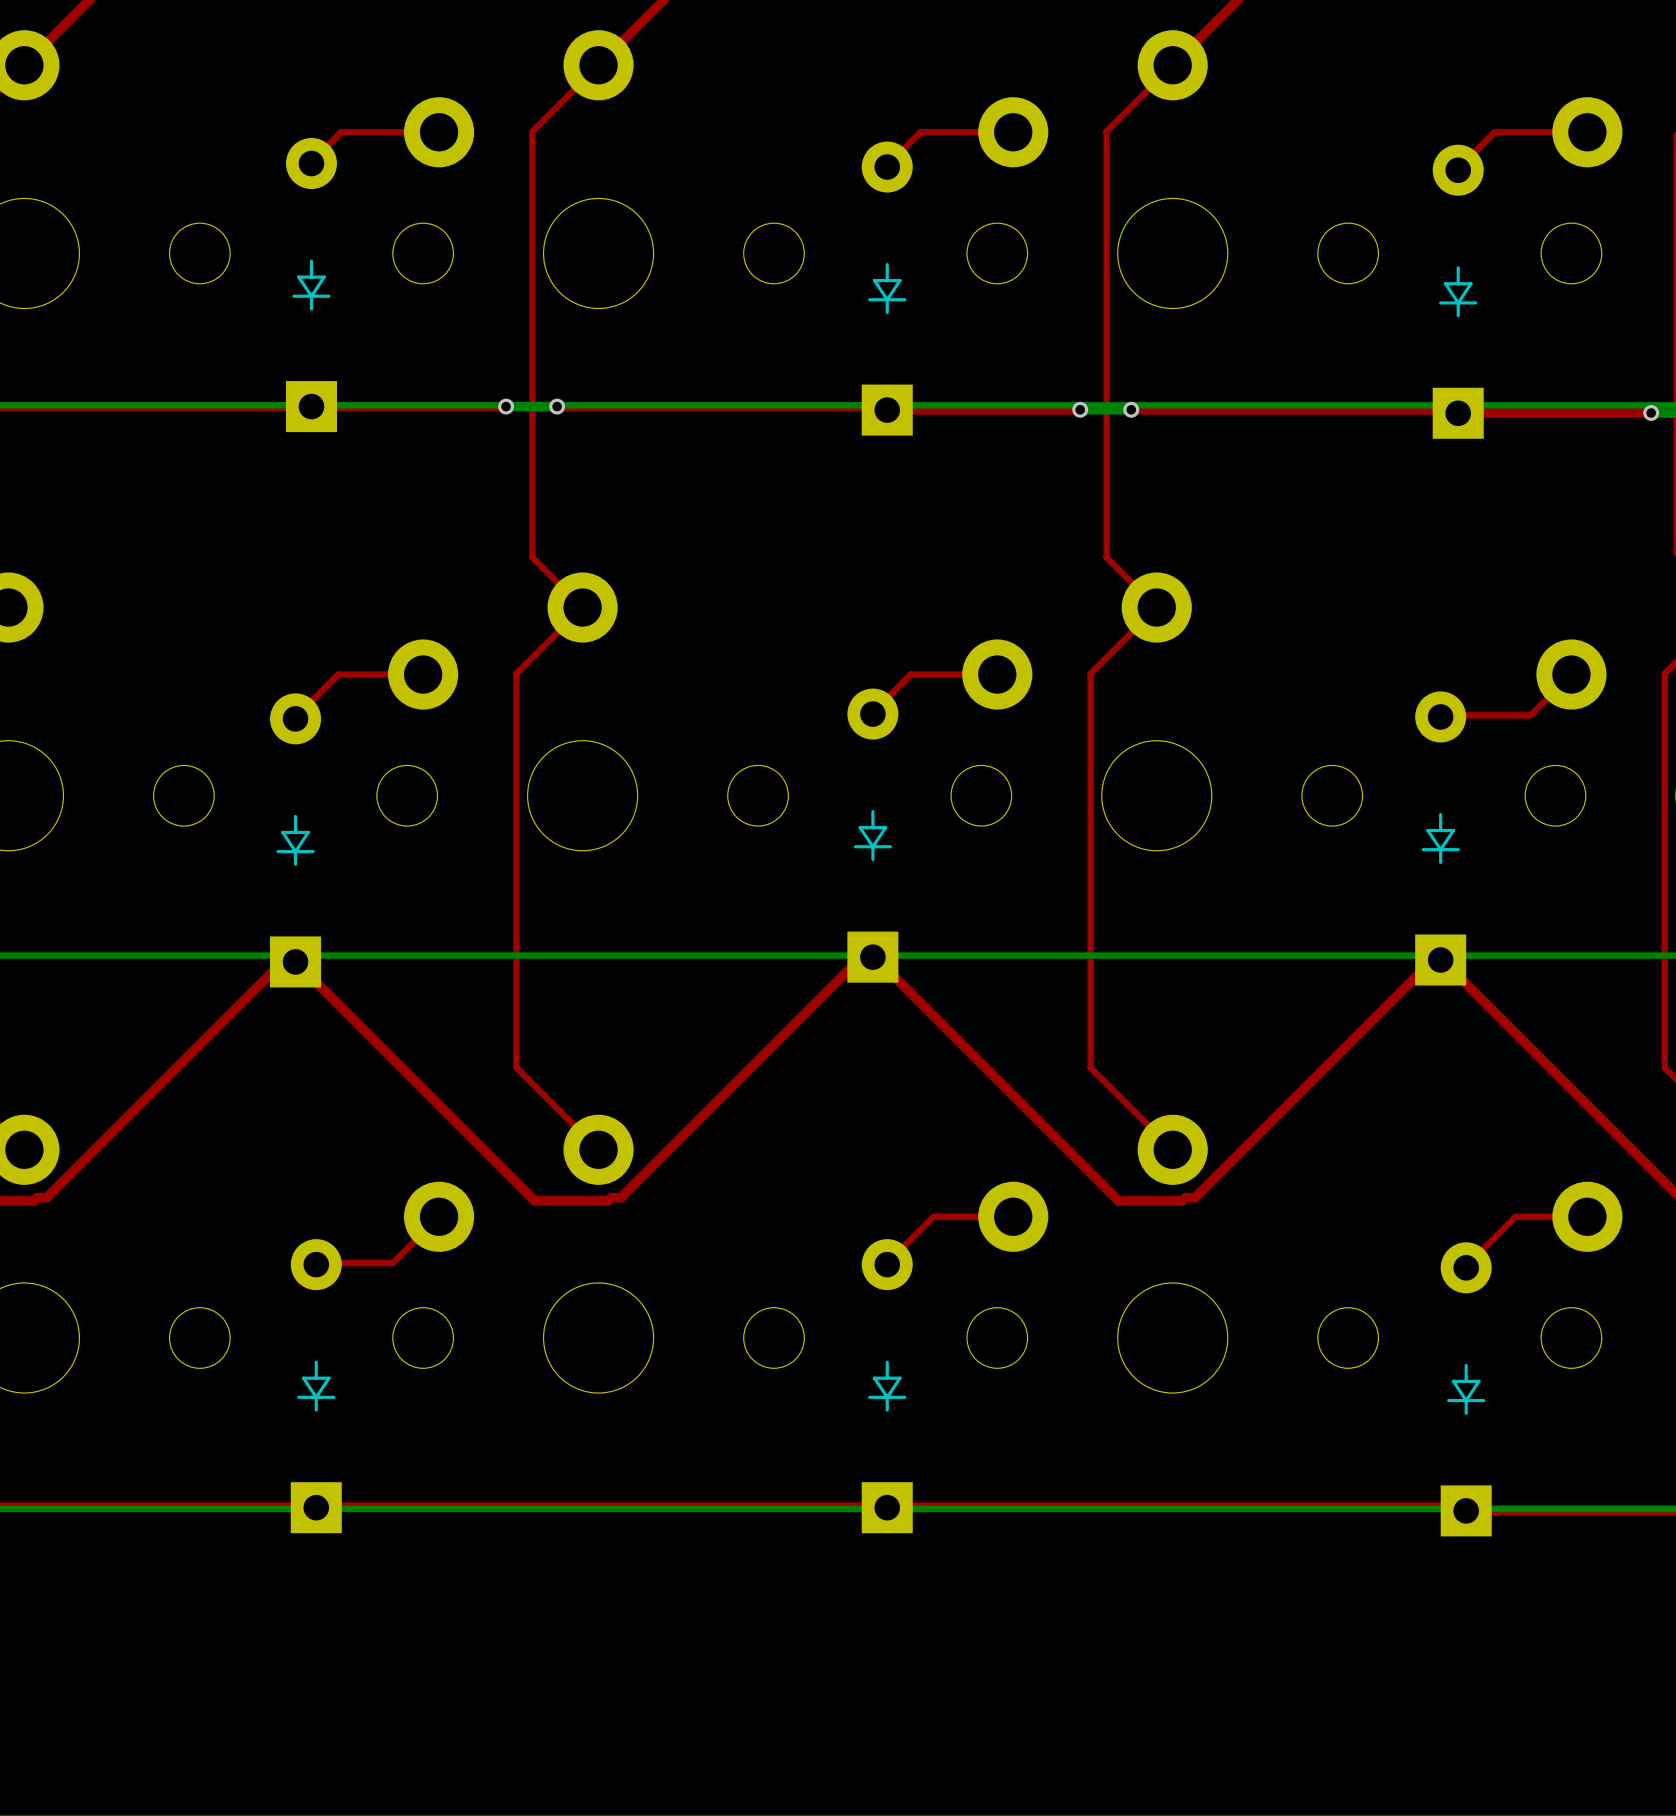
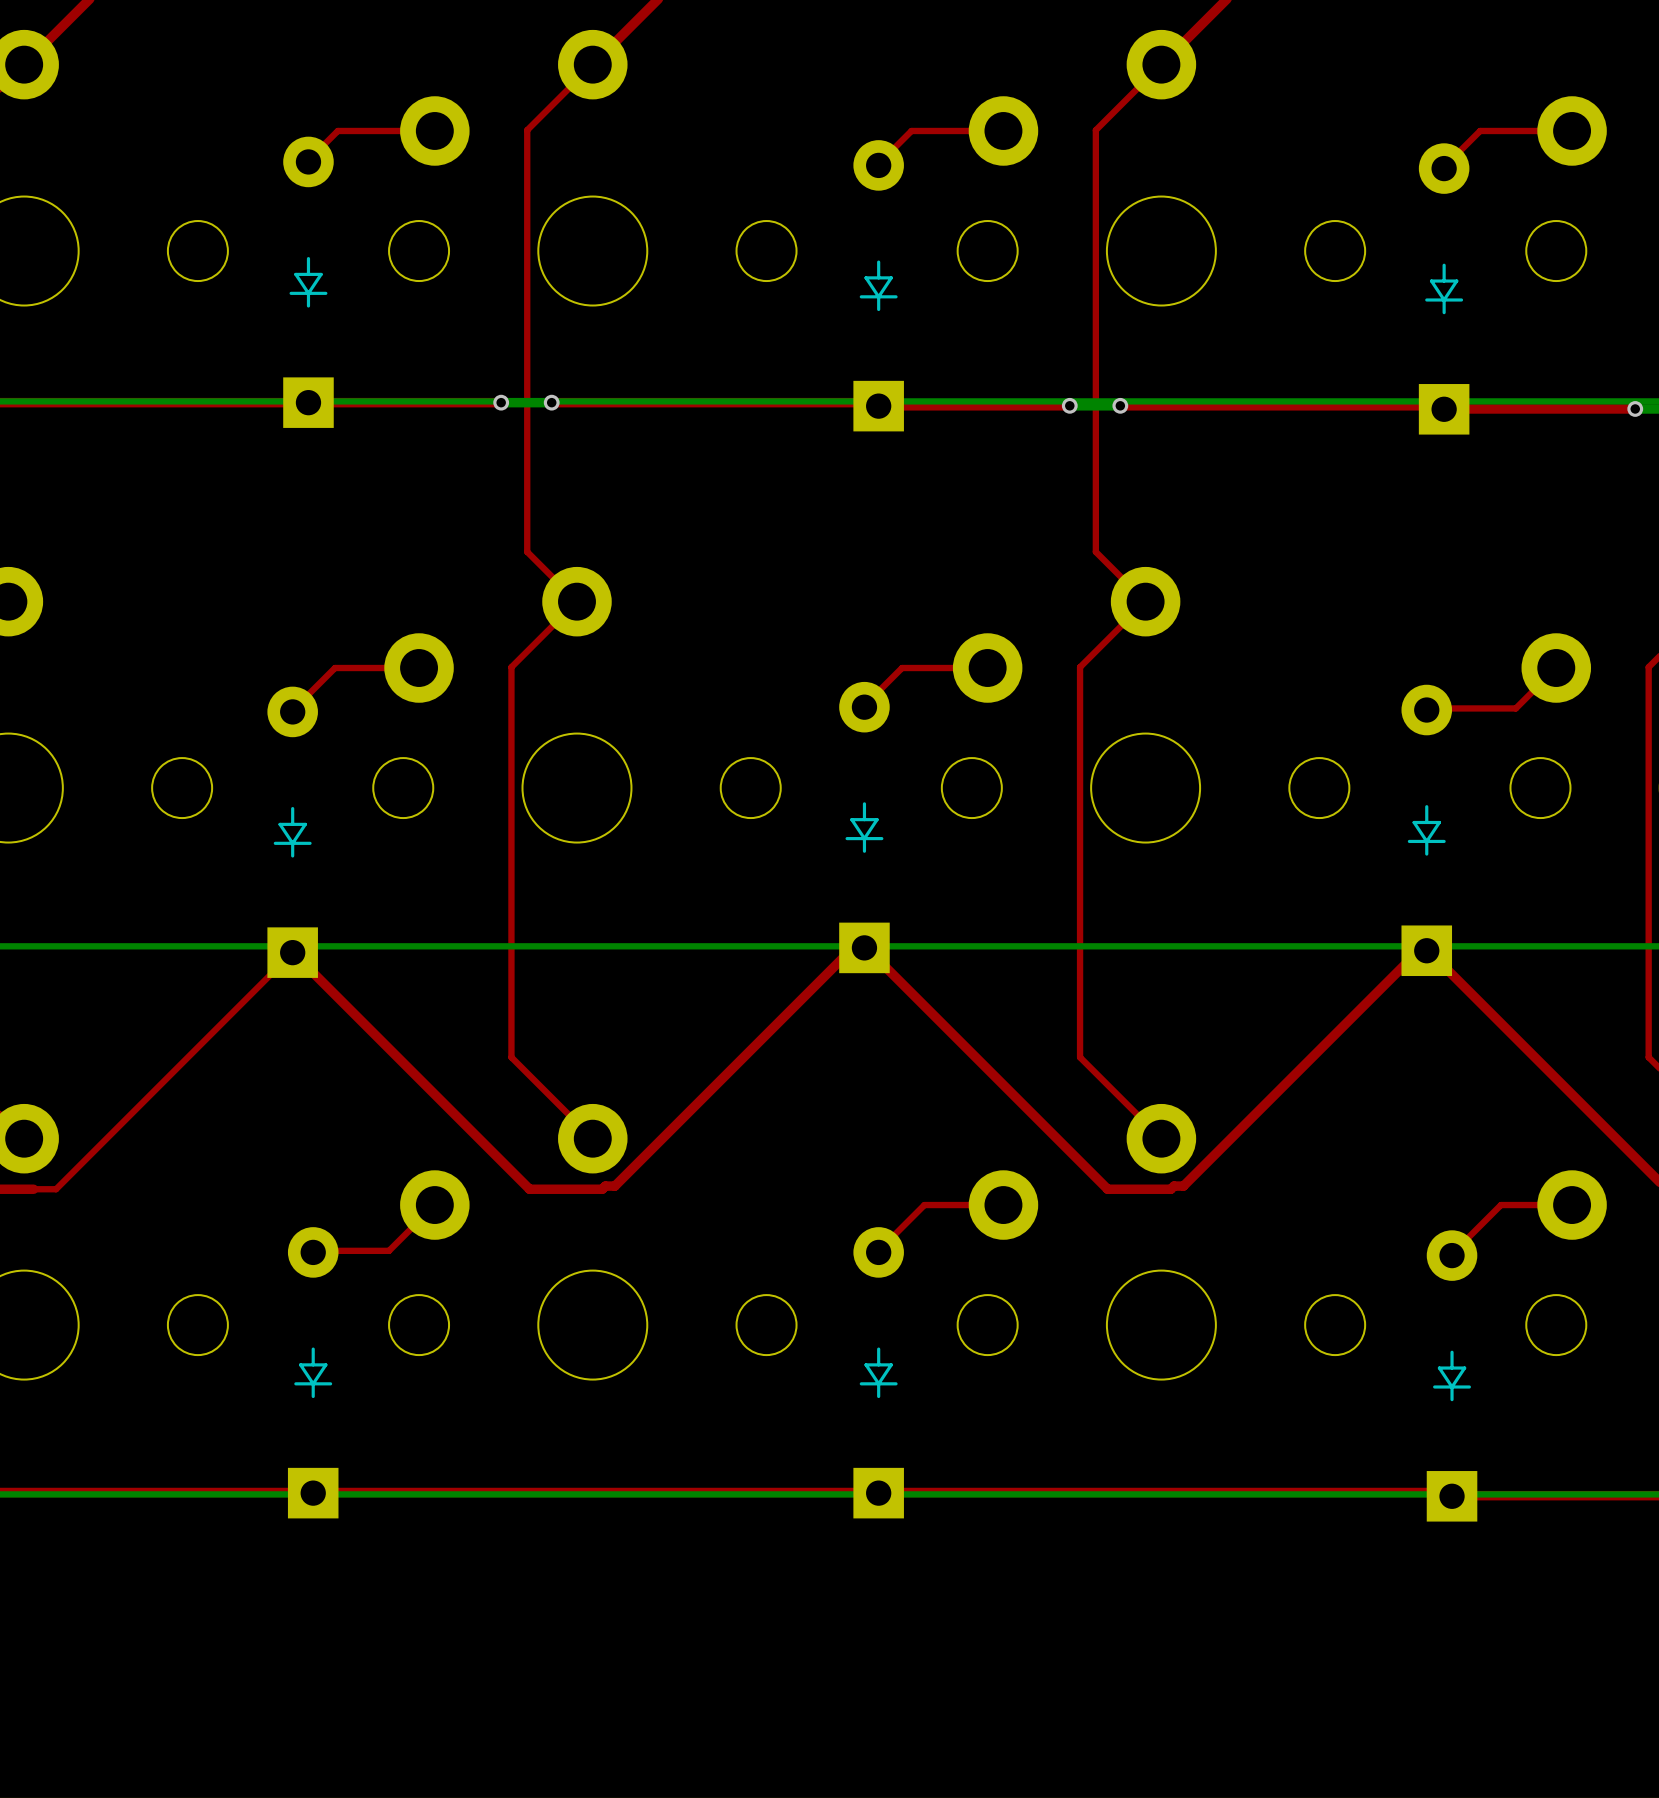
top track: (279, 964) (46, 1197) (37, 1197) (33, 1200) -> (292, 952) (56, 1189) (33, 1189)

